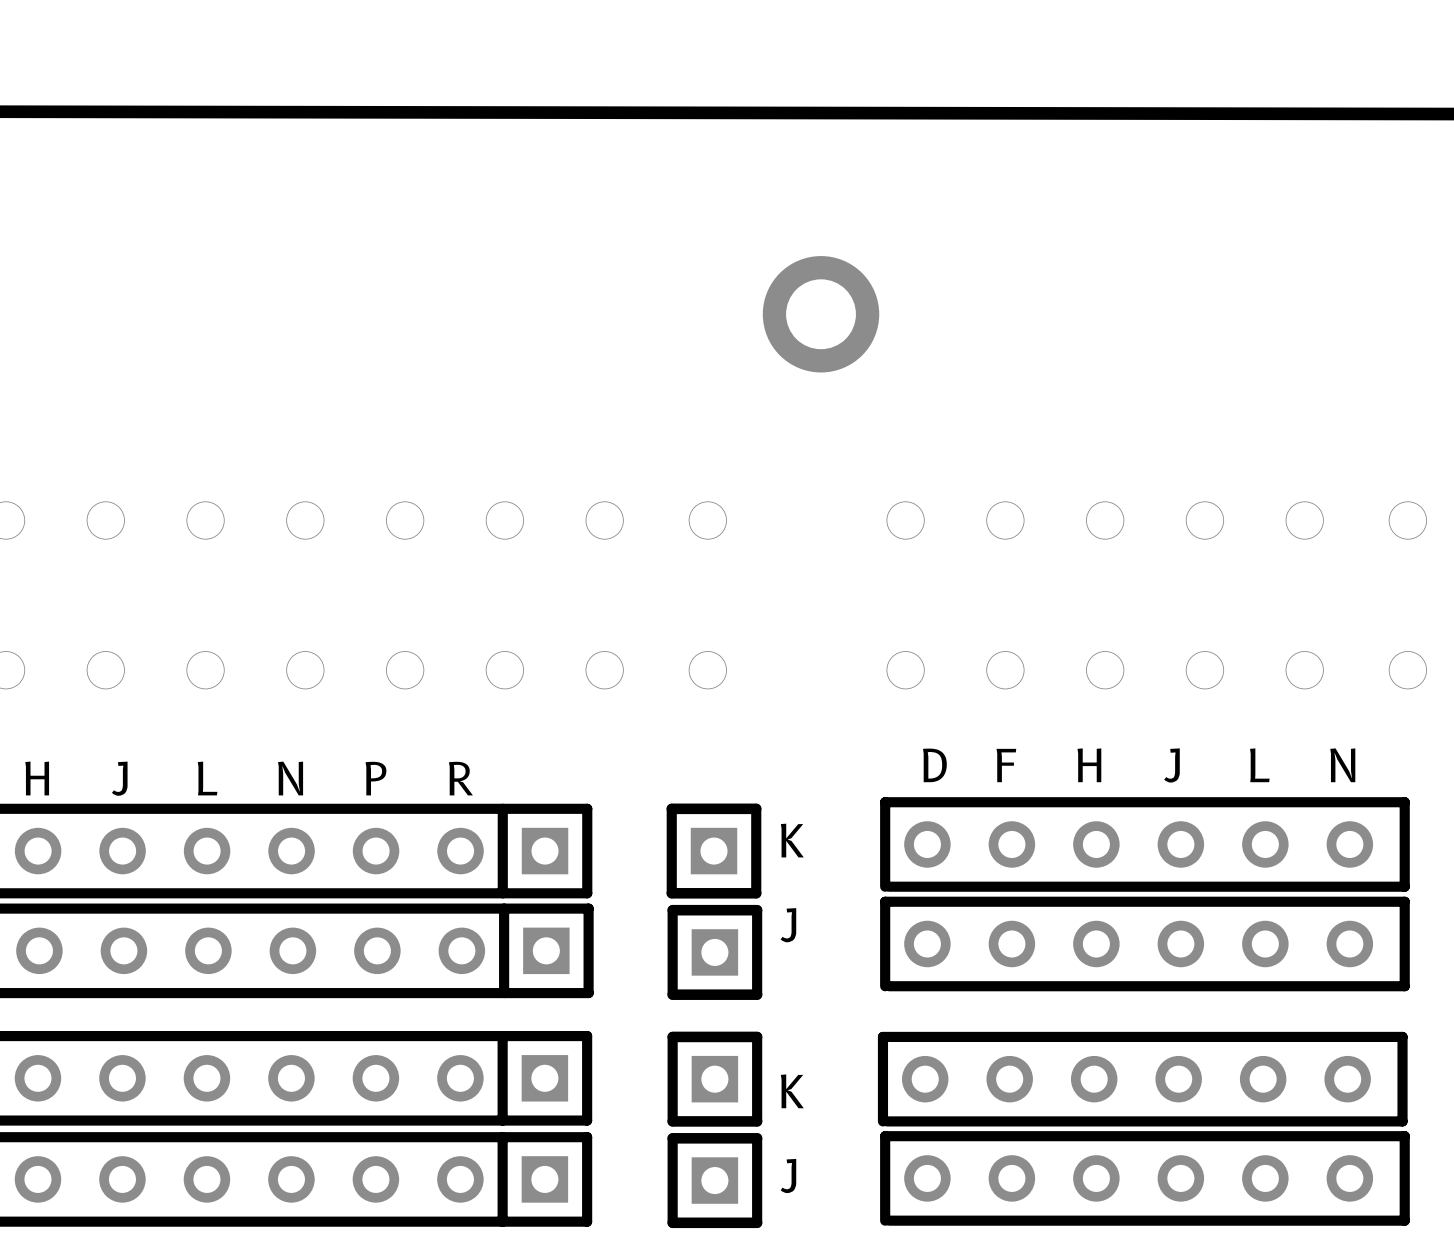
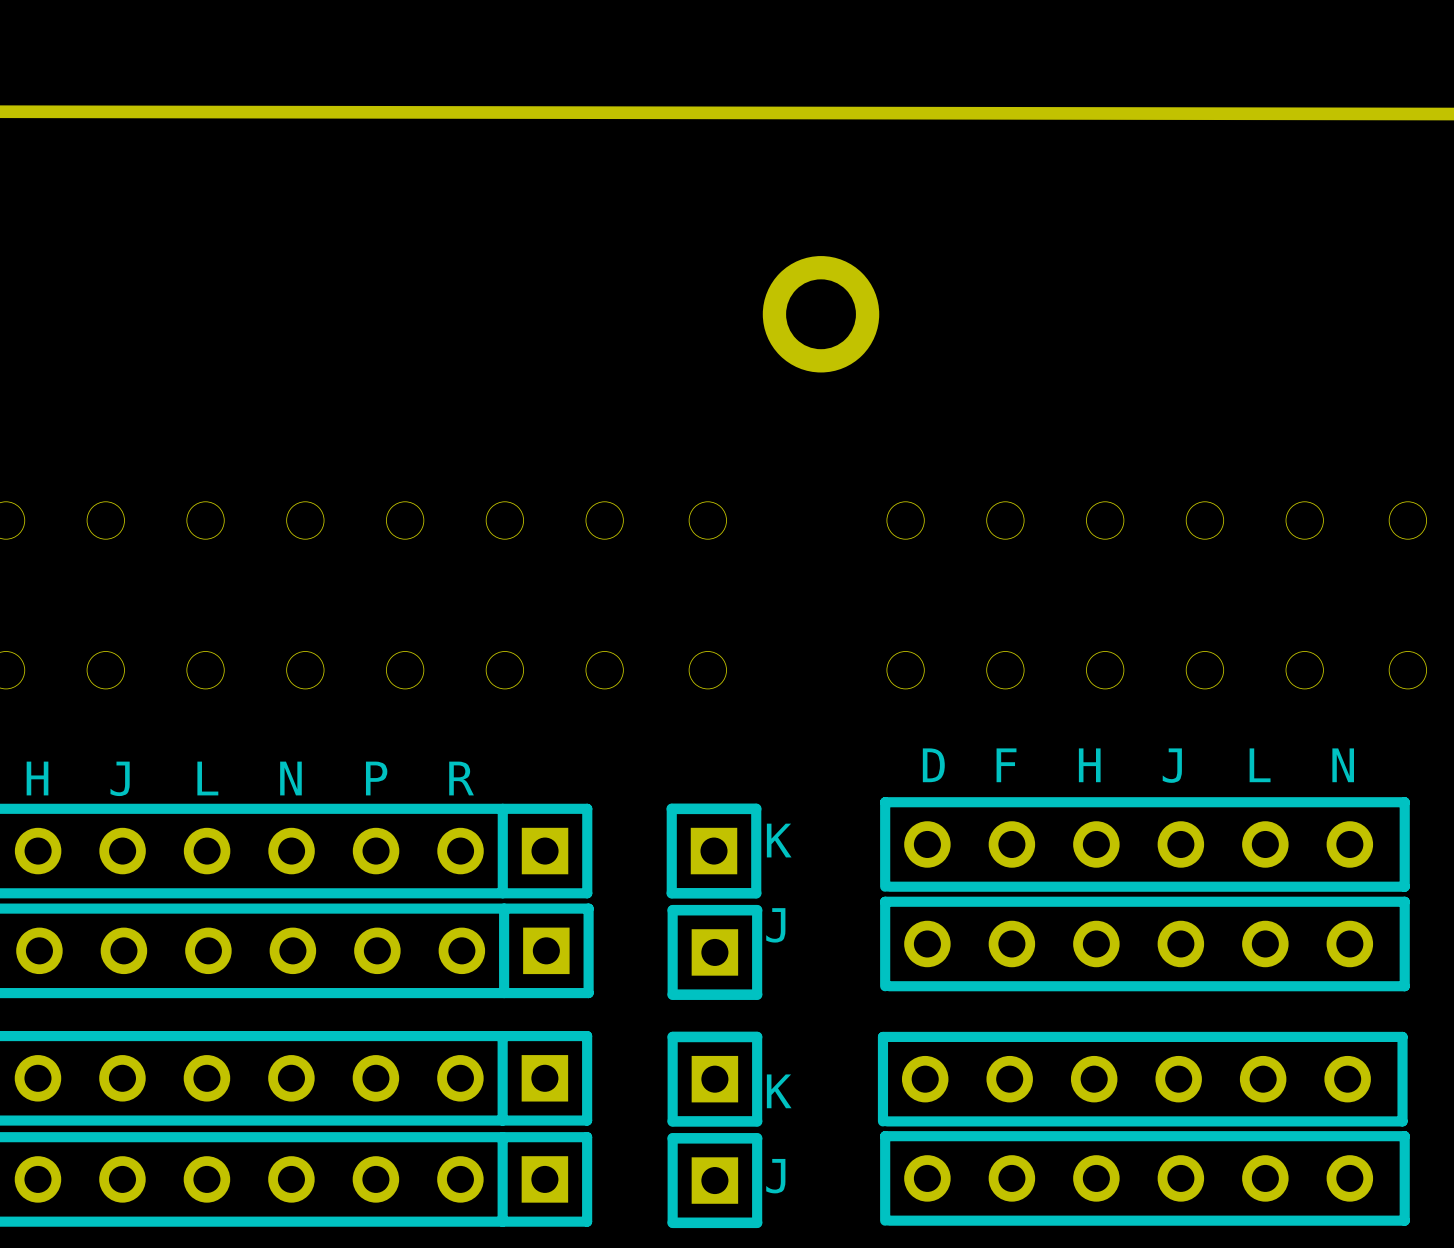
text position: K (792, 840) -> K (779, 840)
text position: J (788, 925) -> J (775, 925)
text position: K (792, 1091) -> K (779, 1091)
text position: J (788, 1176) -> J (775, 1176)

